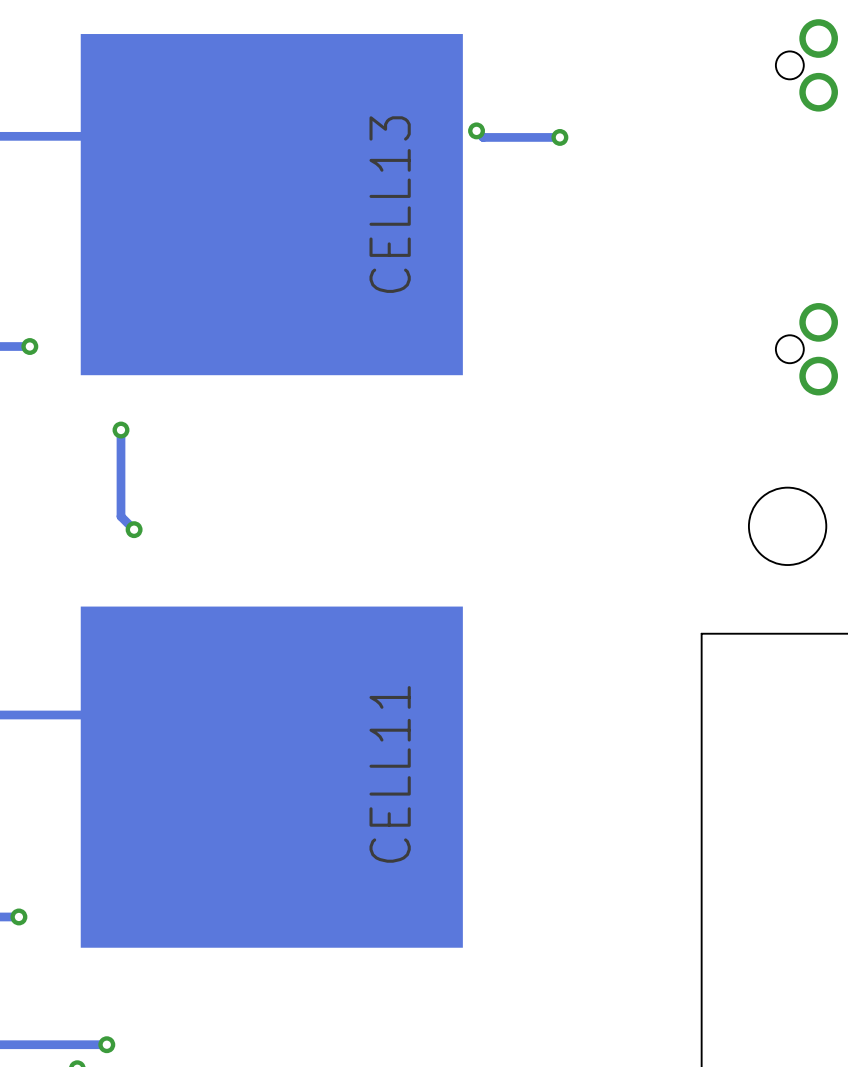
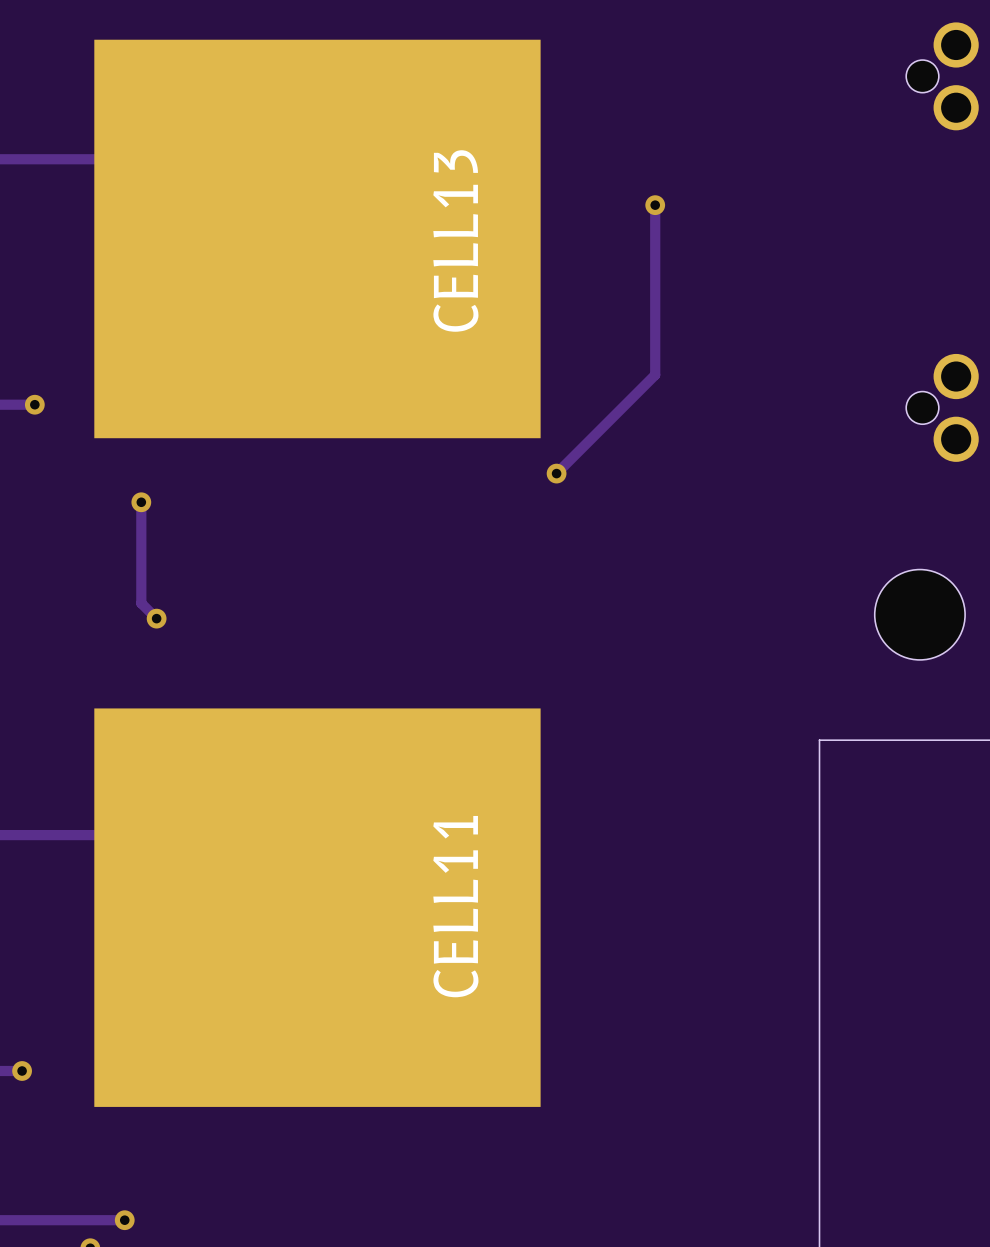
track: (476, 130) (483, 137) (559, 137) -> none
via: (476, 130) -> none
via position: (559, 137) -> (655, 205)
track: none -> (655, 205) (655, 374) (556, 473)
via: none -> (556, 473)

